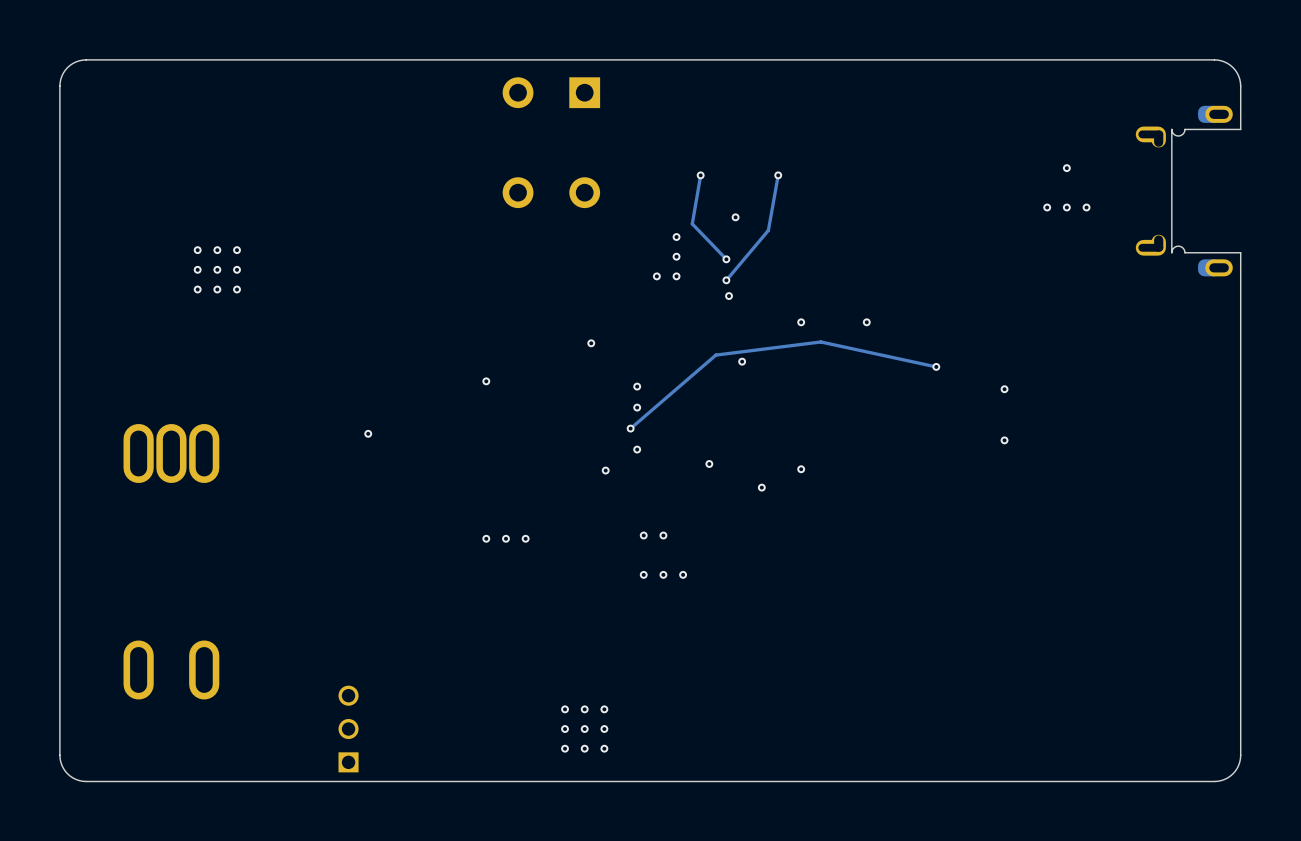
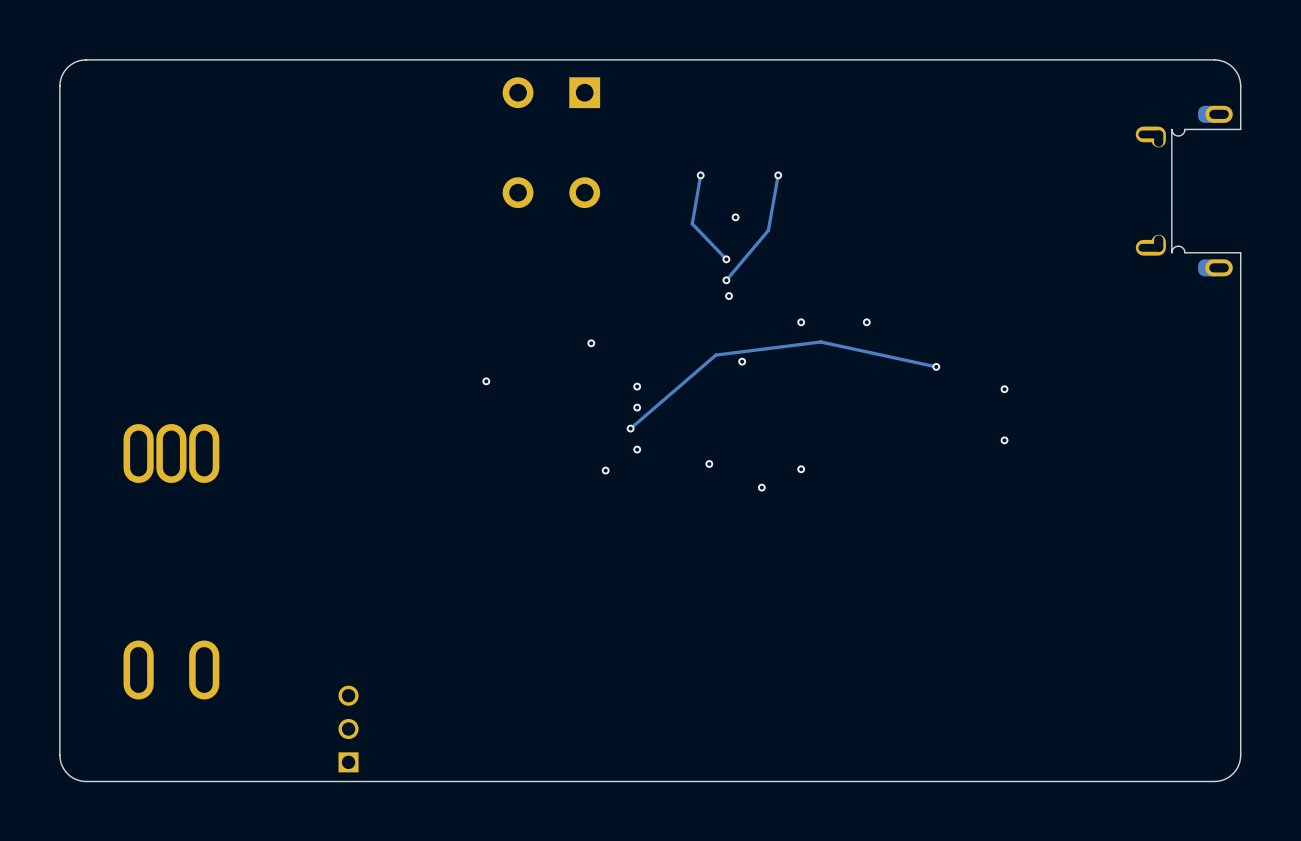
via: (1066, 168) -> none
via: (1047, 207) -> none
via: (1066, 207) -> none
via: (1086, 207) -> none
via: (676, 237) -> none
via: (197, 250) -> none
via: (217, 250) -> none
via: (237, 250) -> none
via: (676, 256) -> none
via: (197, 269) -> none
via: (217, 269) -> none
via: (237, 269) -> none
via: (656, 276) -> none
via: (676, 276) -> none
via: (197, 289) -> none
via: (217, 289) -> none
via: (237, 289) -> none
via: (368, 433) -> none
via: (643, 535) -> none
via: (663, 535) -> none
via: (486, 538) -> none
via: (505, 538) -> none
via: (525, 538) -> none
via: (643, 574) -> none
via: (663, 574) -> none
via: (683, 574) -> none
via: (565, 709) -> none
via: (584, 709) -> none
via: (604, 709) -> none
via: (565, 729) -> none
via: (584, 729) -> none
via: (604, 729) -> none
via: (565, 748) -> none
via: (584, 748) -> none
via: (604, 748) -> none

